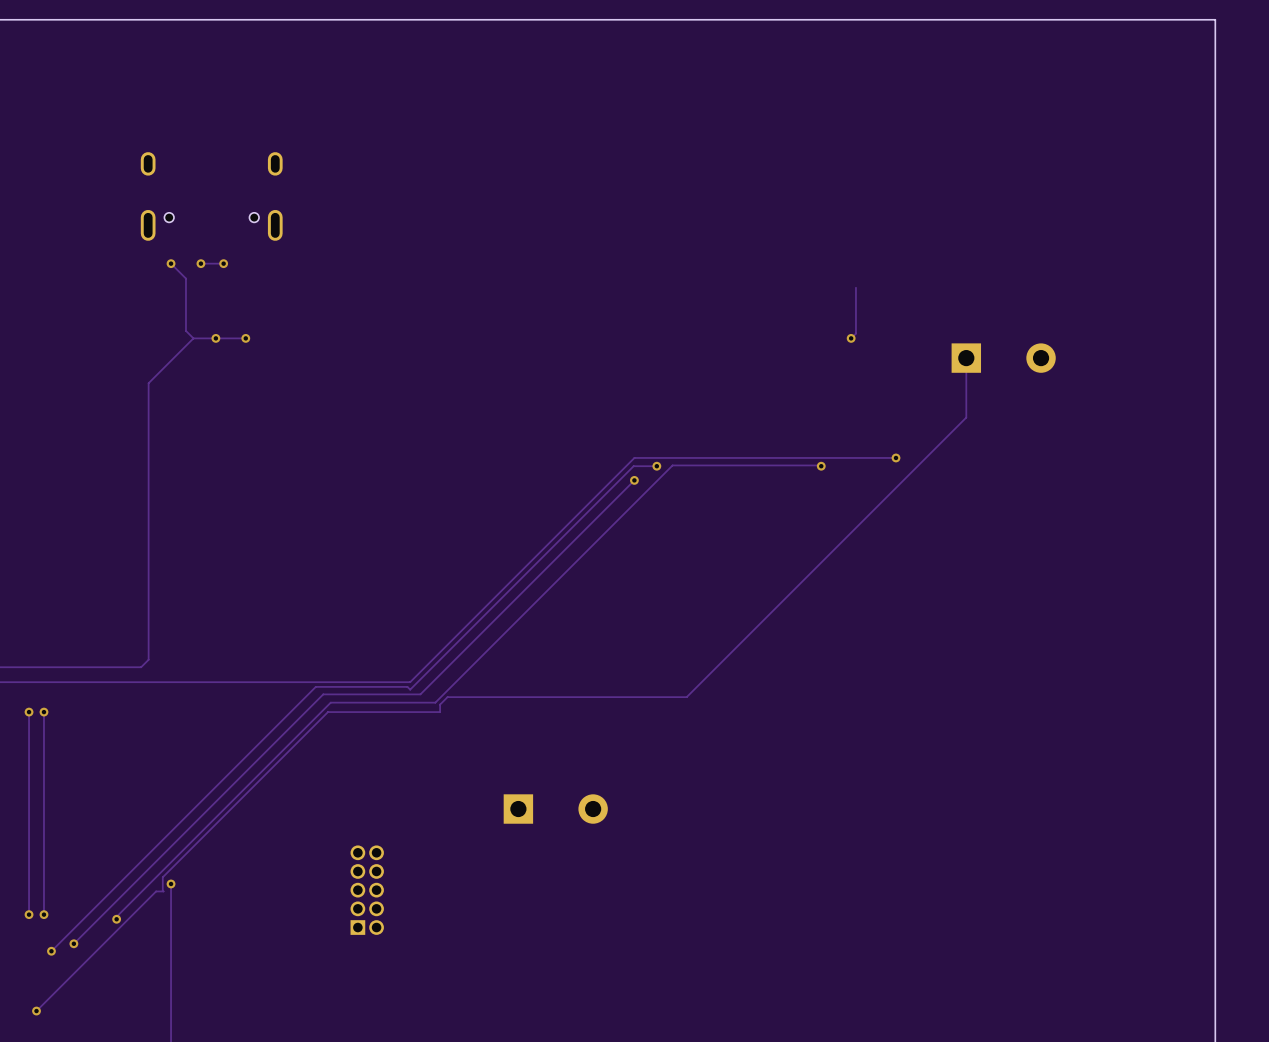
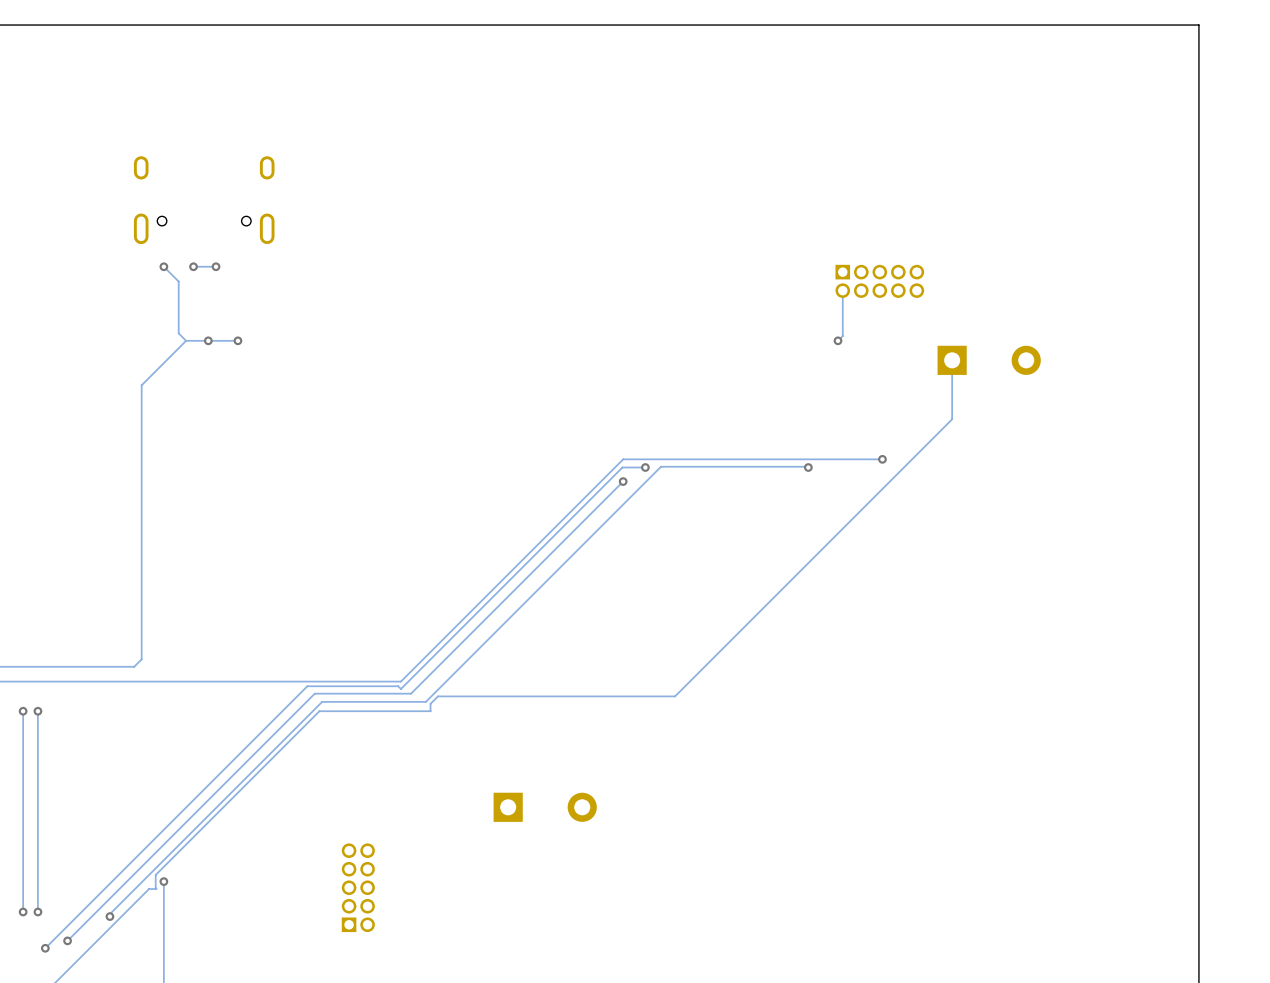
part: none -> (879, 281)

